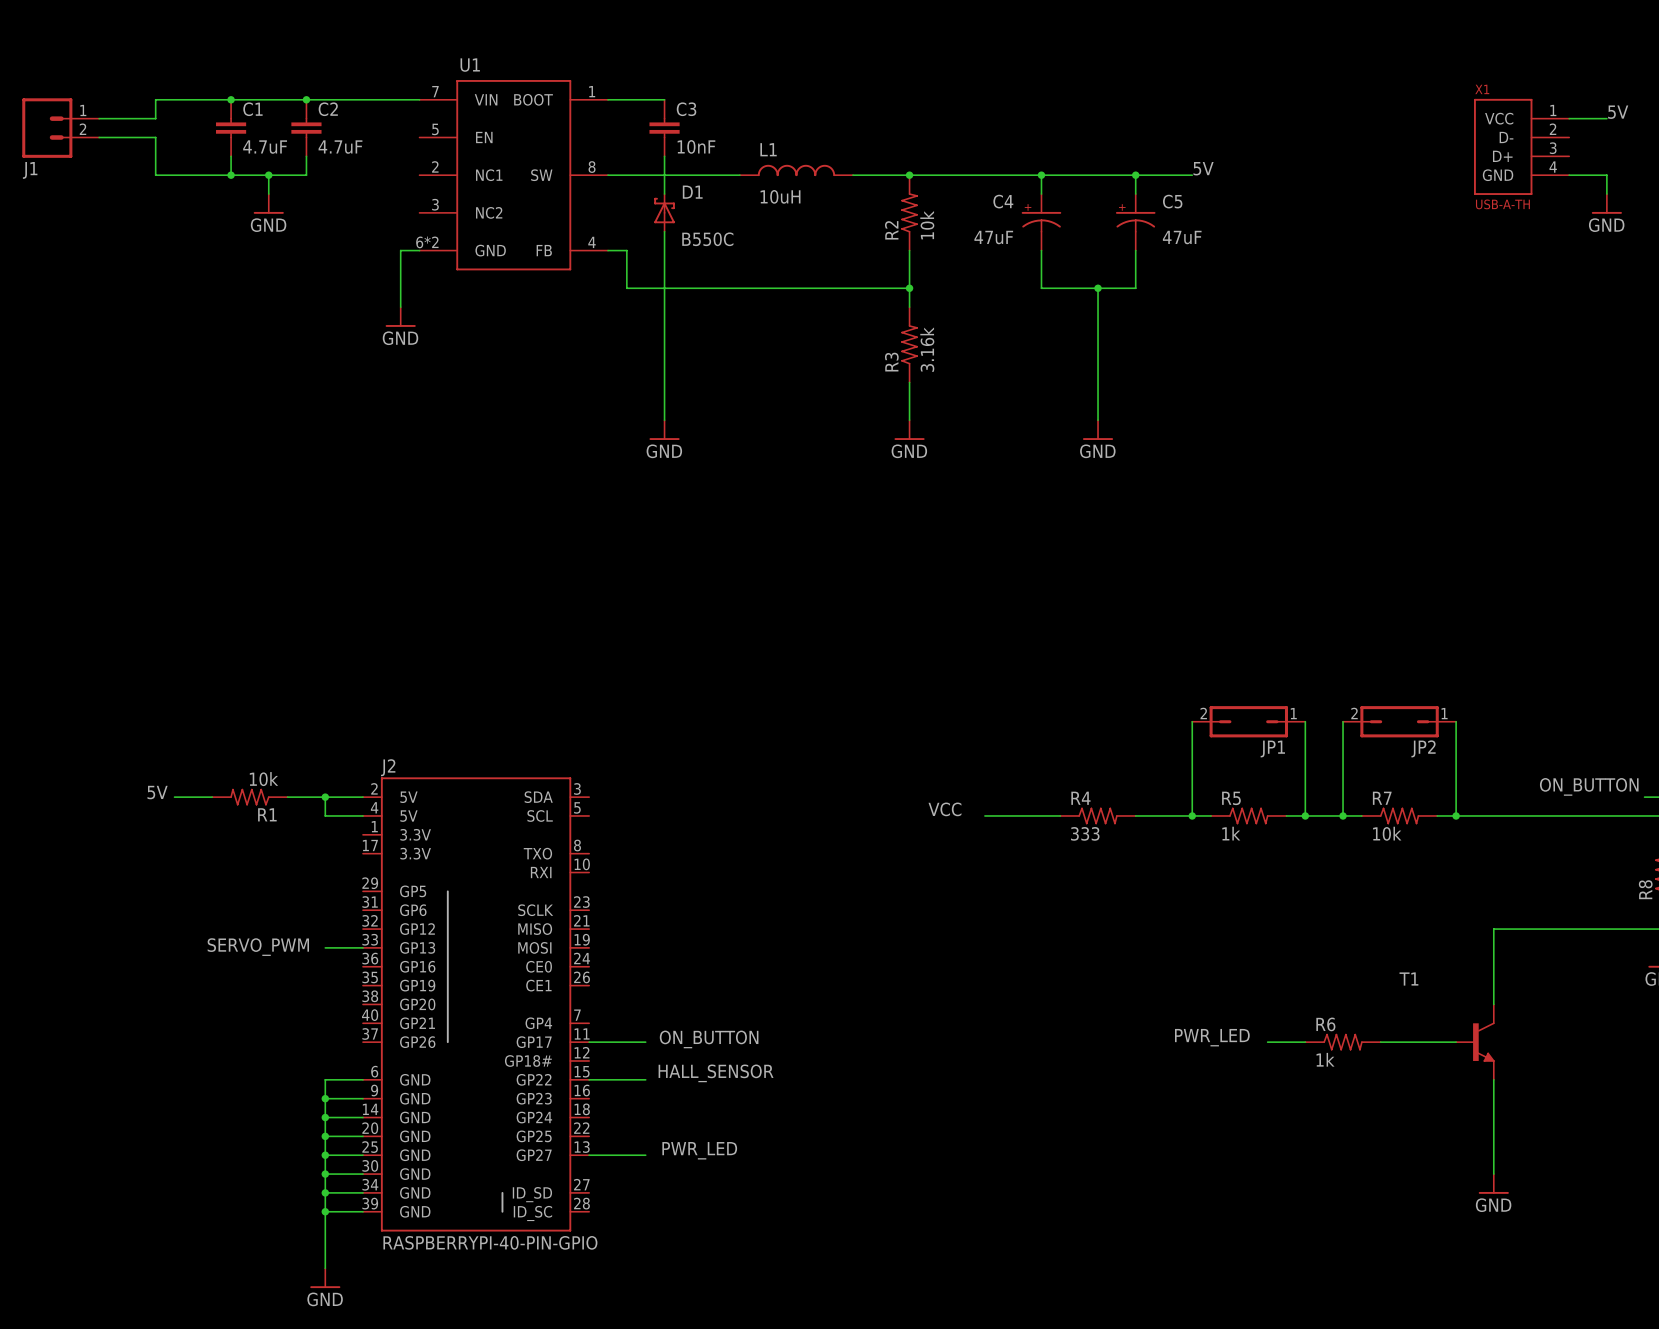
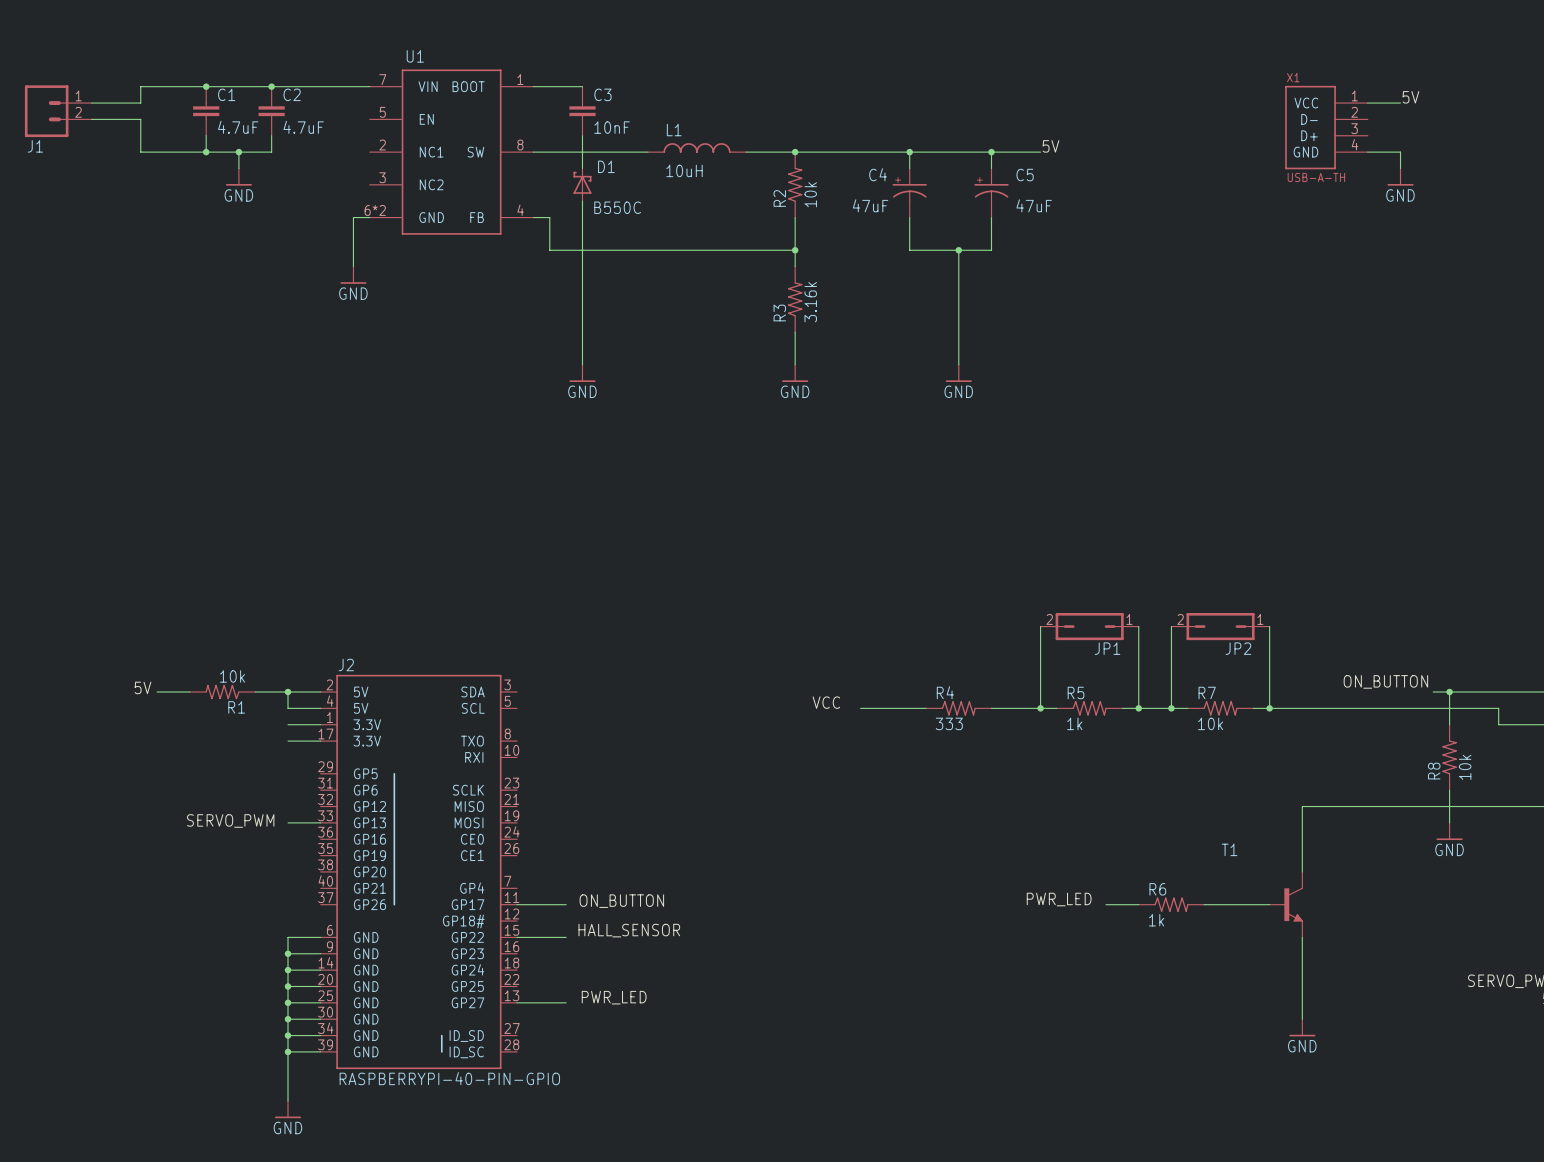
wire: none -> (288, 724) (320, 724)
wire: none -> (288, 741) (320, 741)

